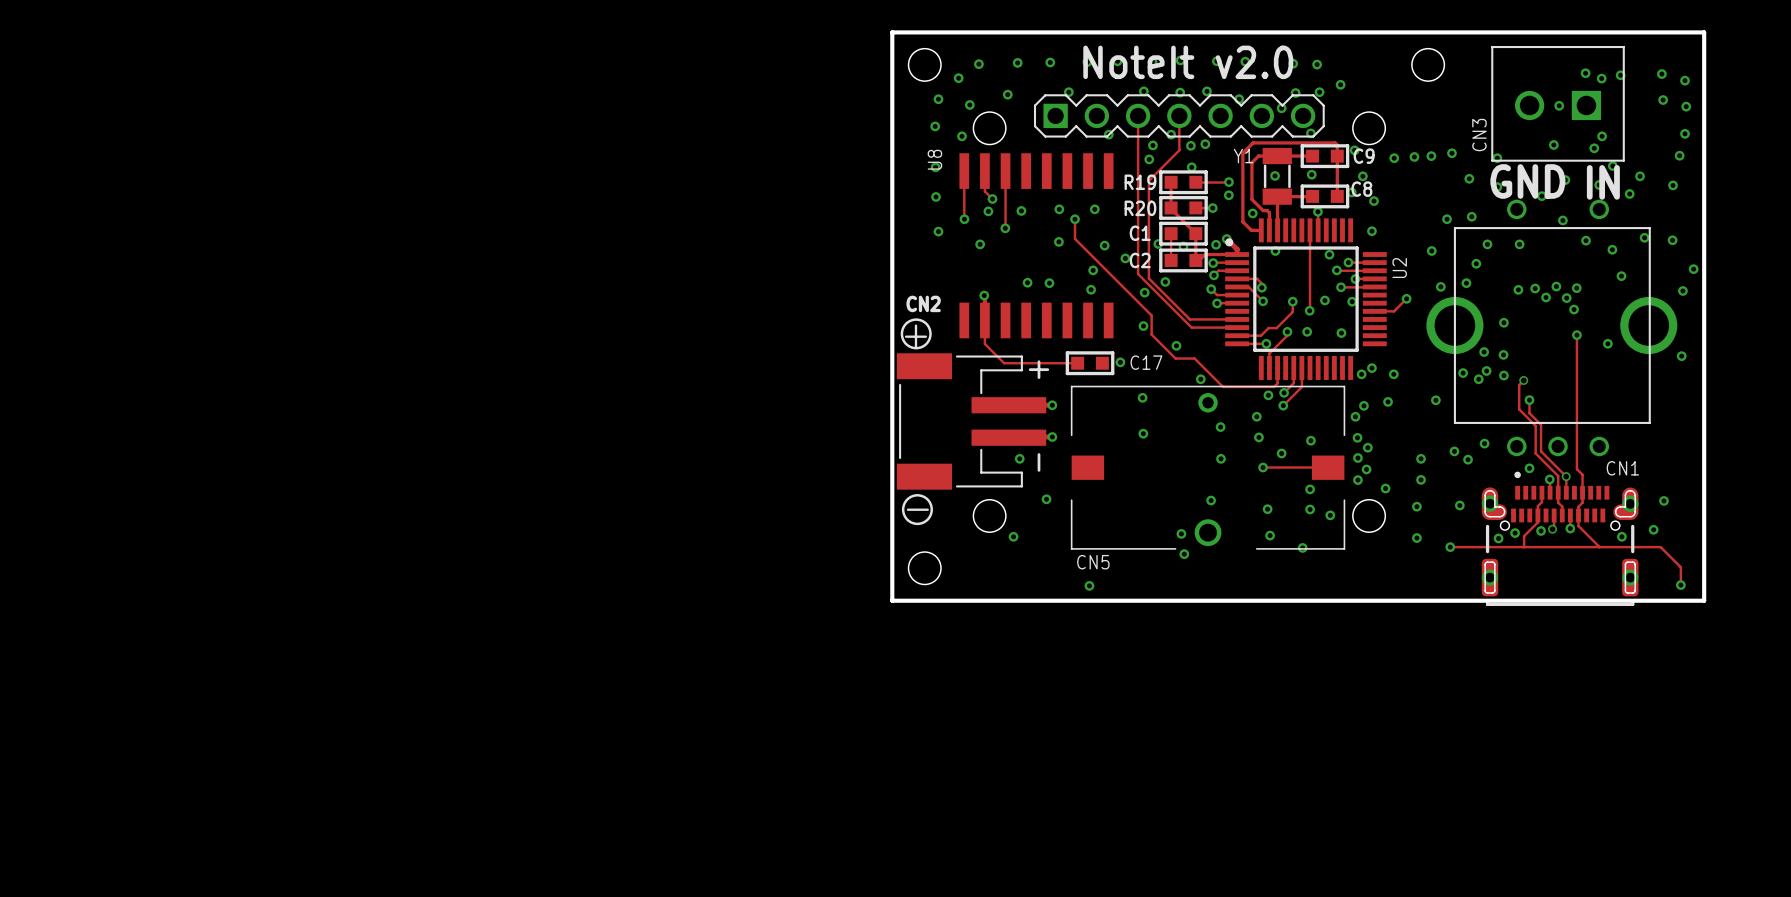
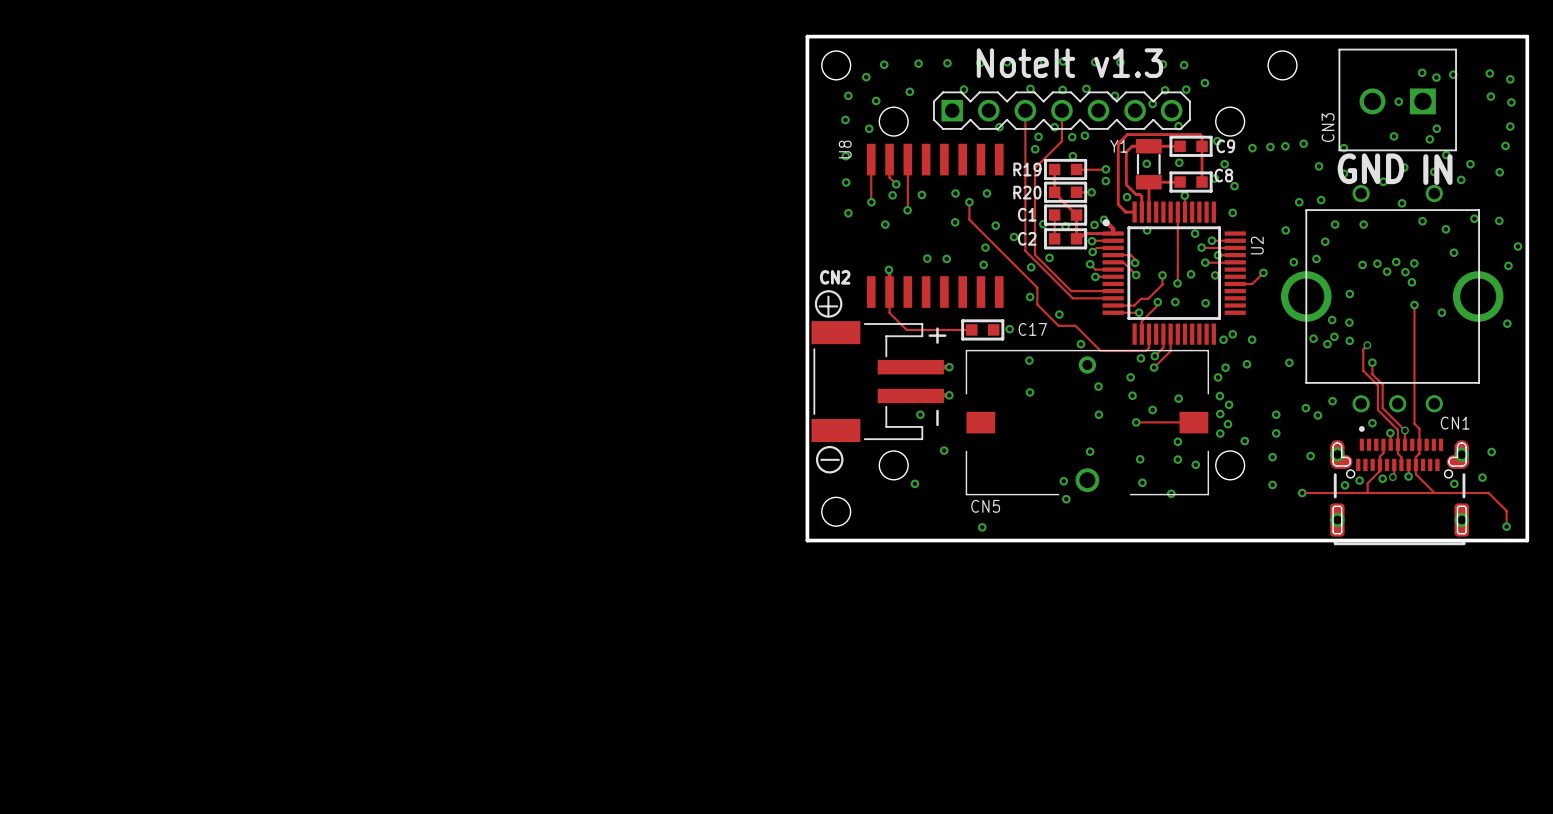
text: NoteIt v2.0 (1188, 62) -> NoteIt v1.3 (1069, 63)

